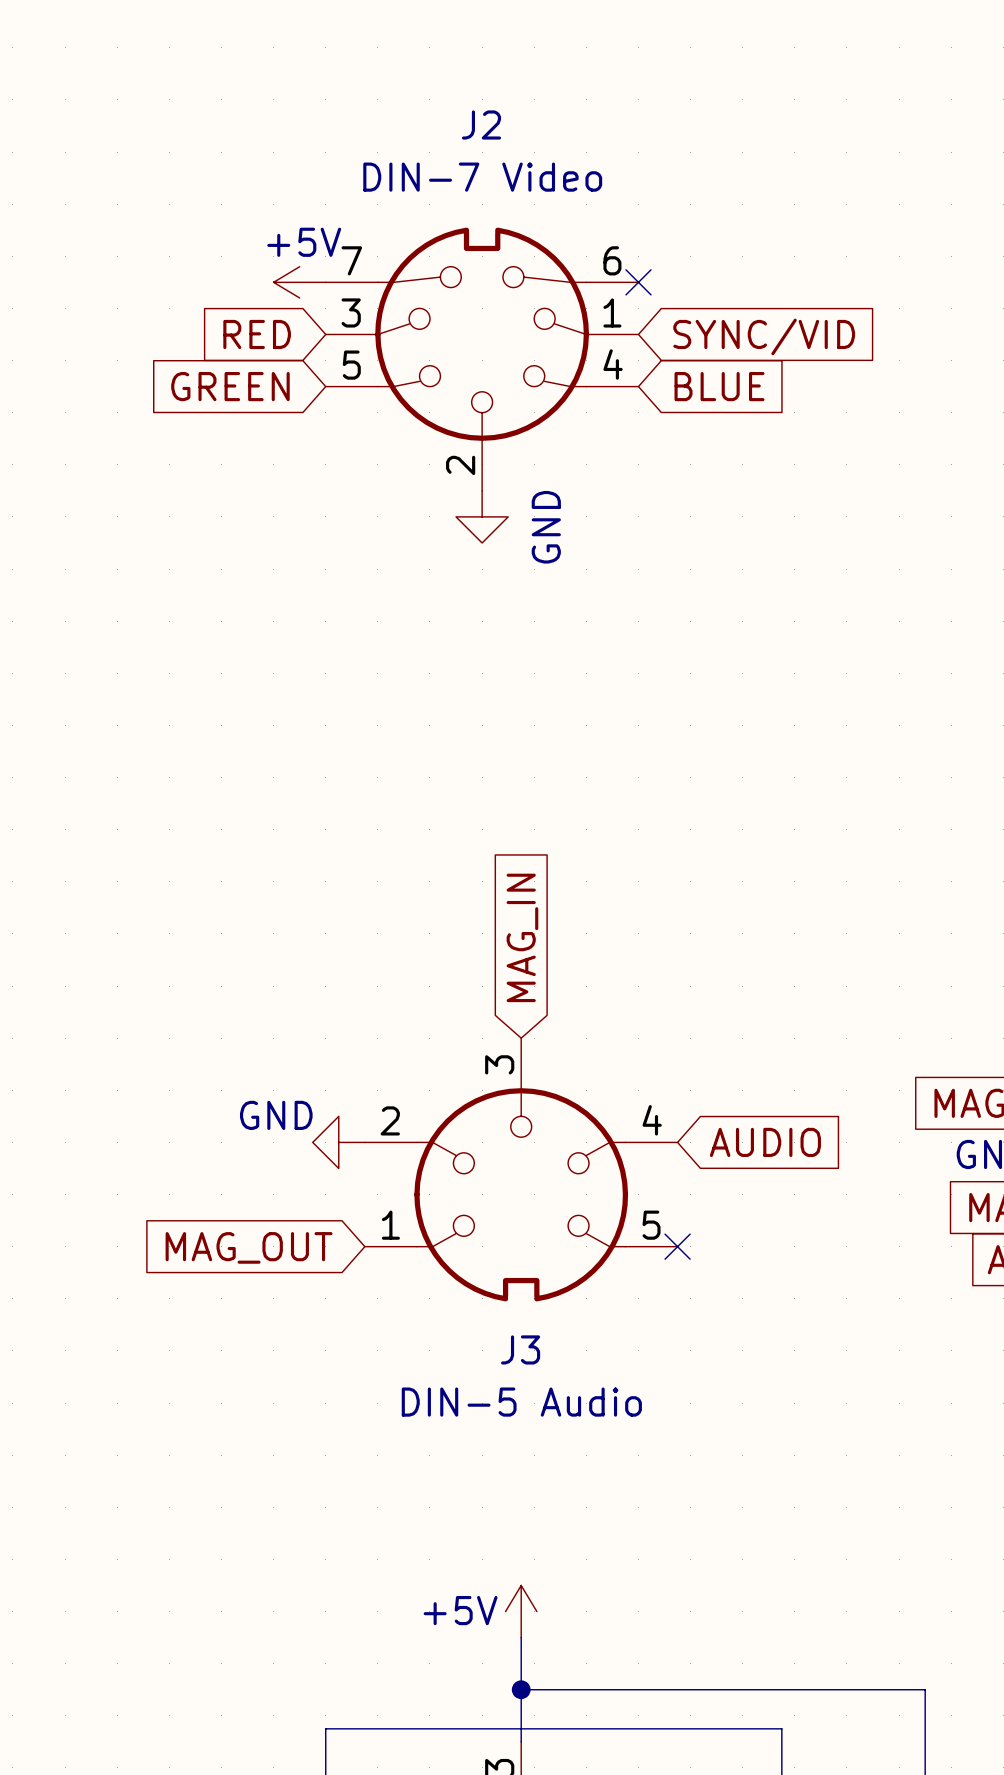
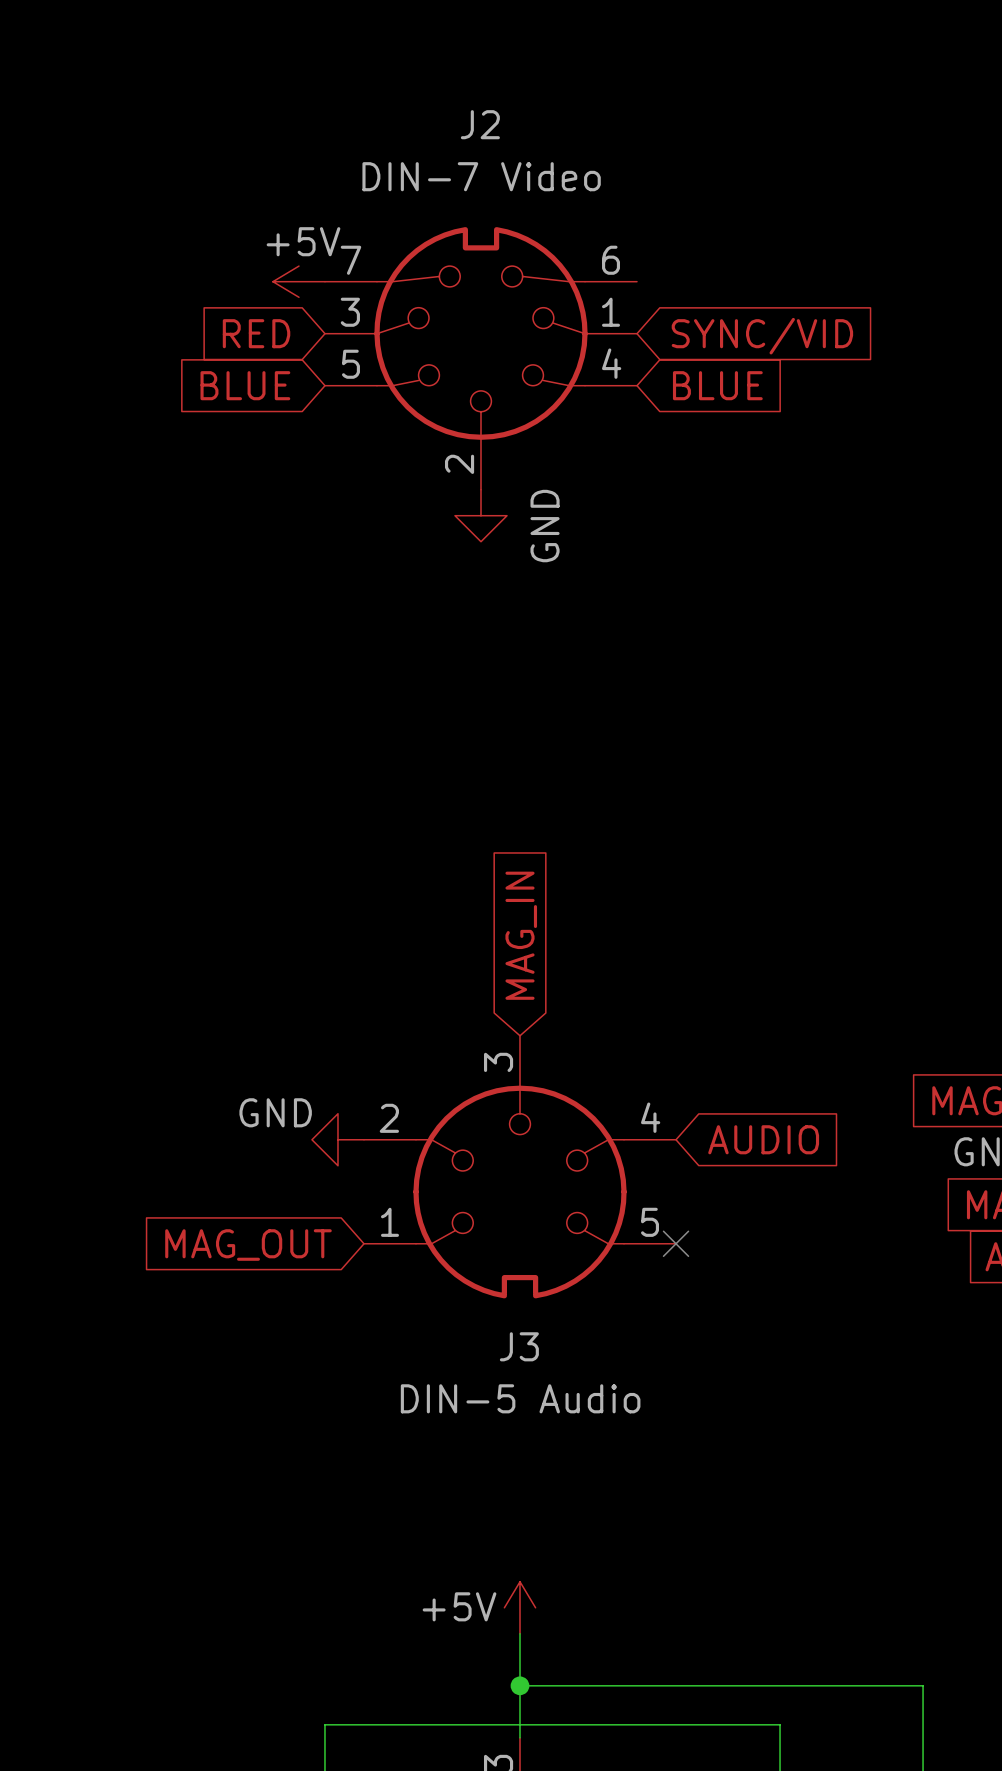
no-connect mark: (638, 282) -> none
global label: GREEN (230, 386) -> BLUE (245, 385)

